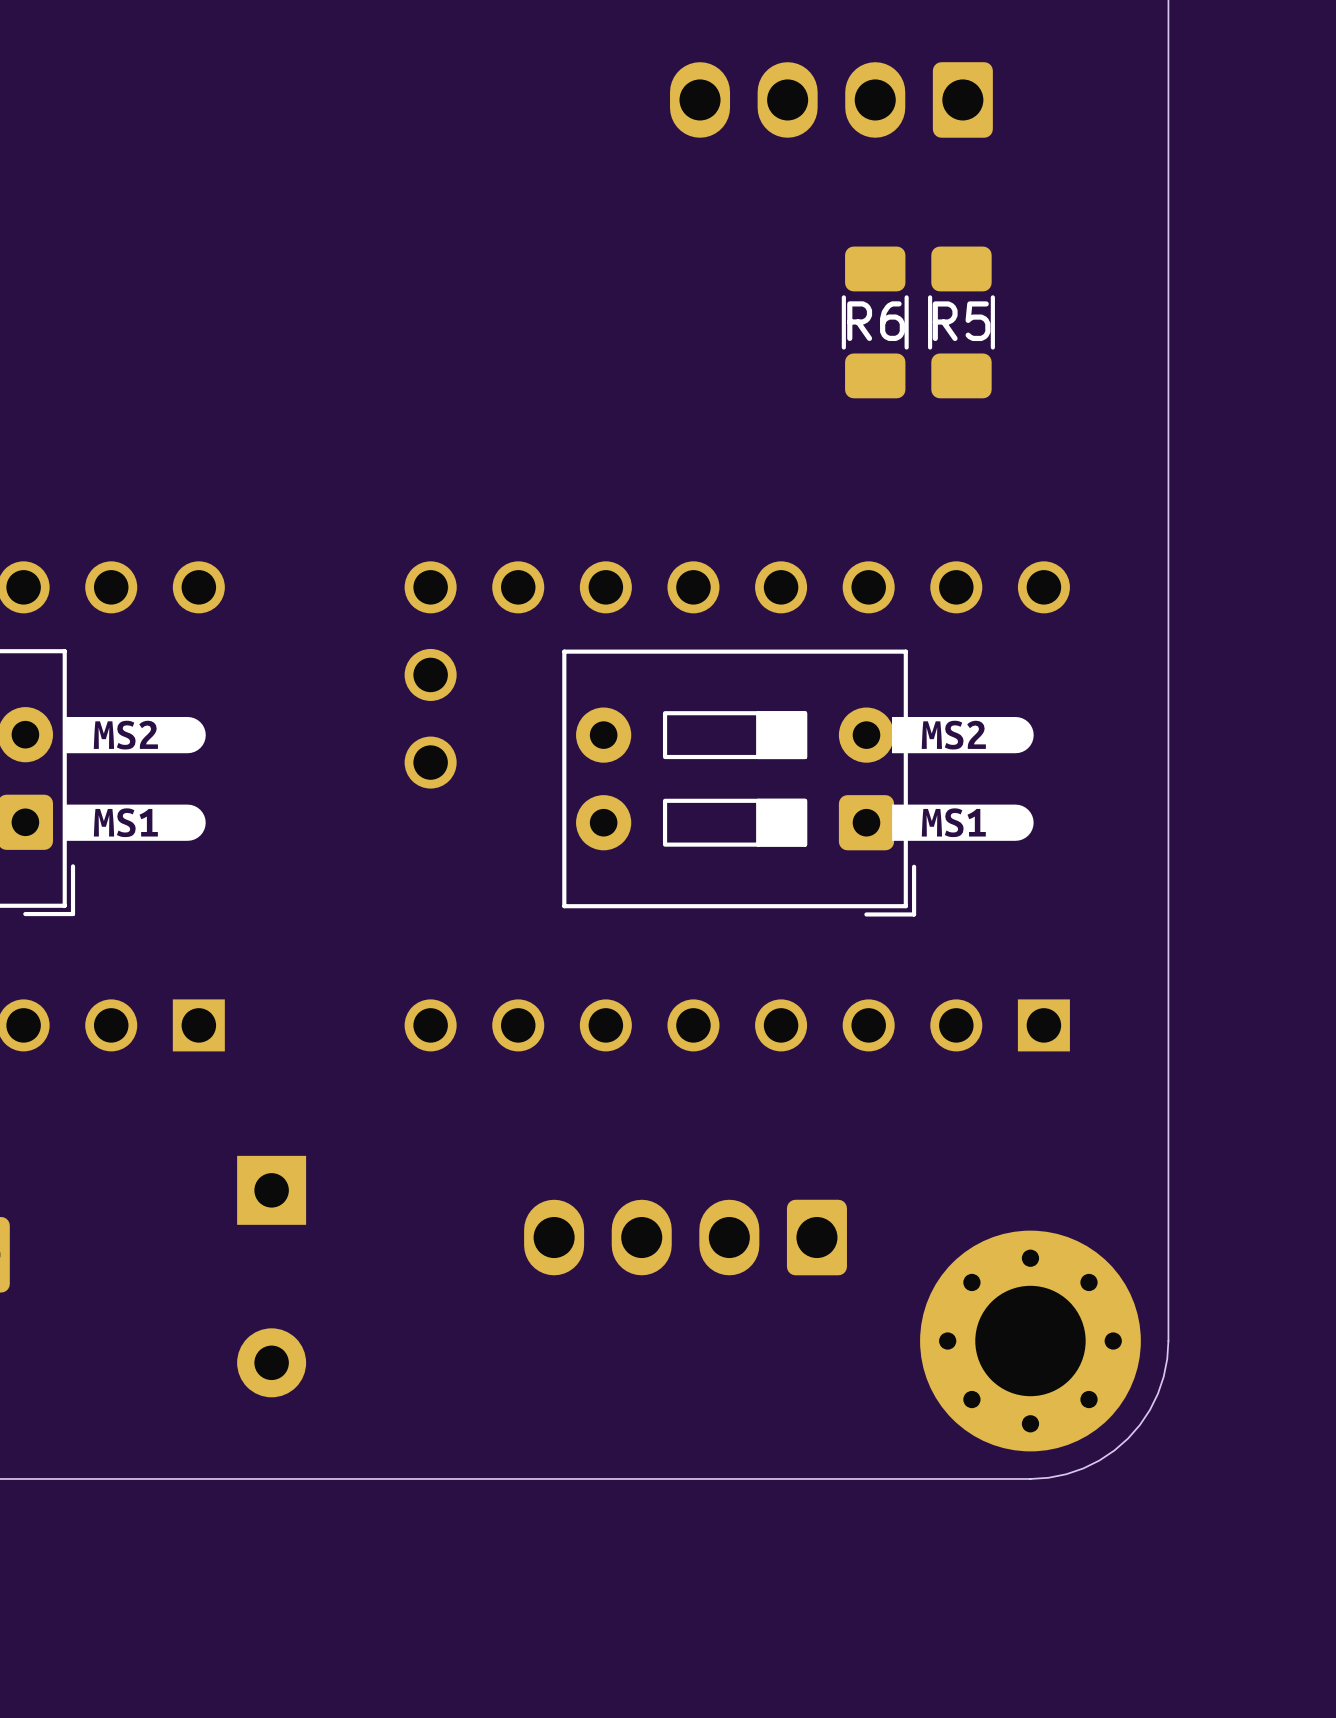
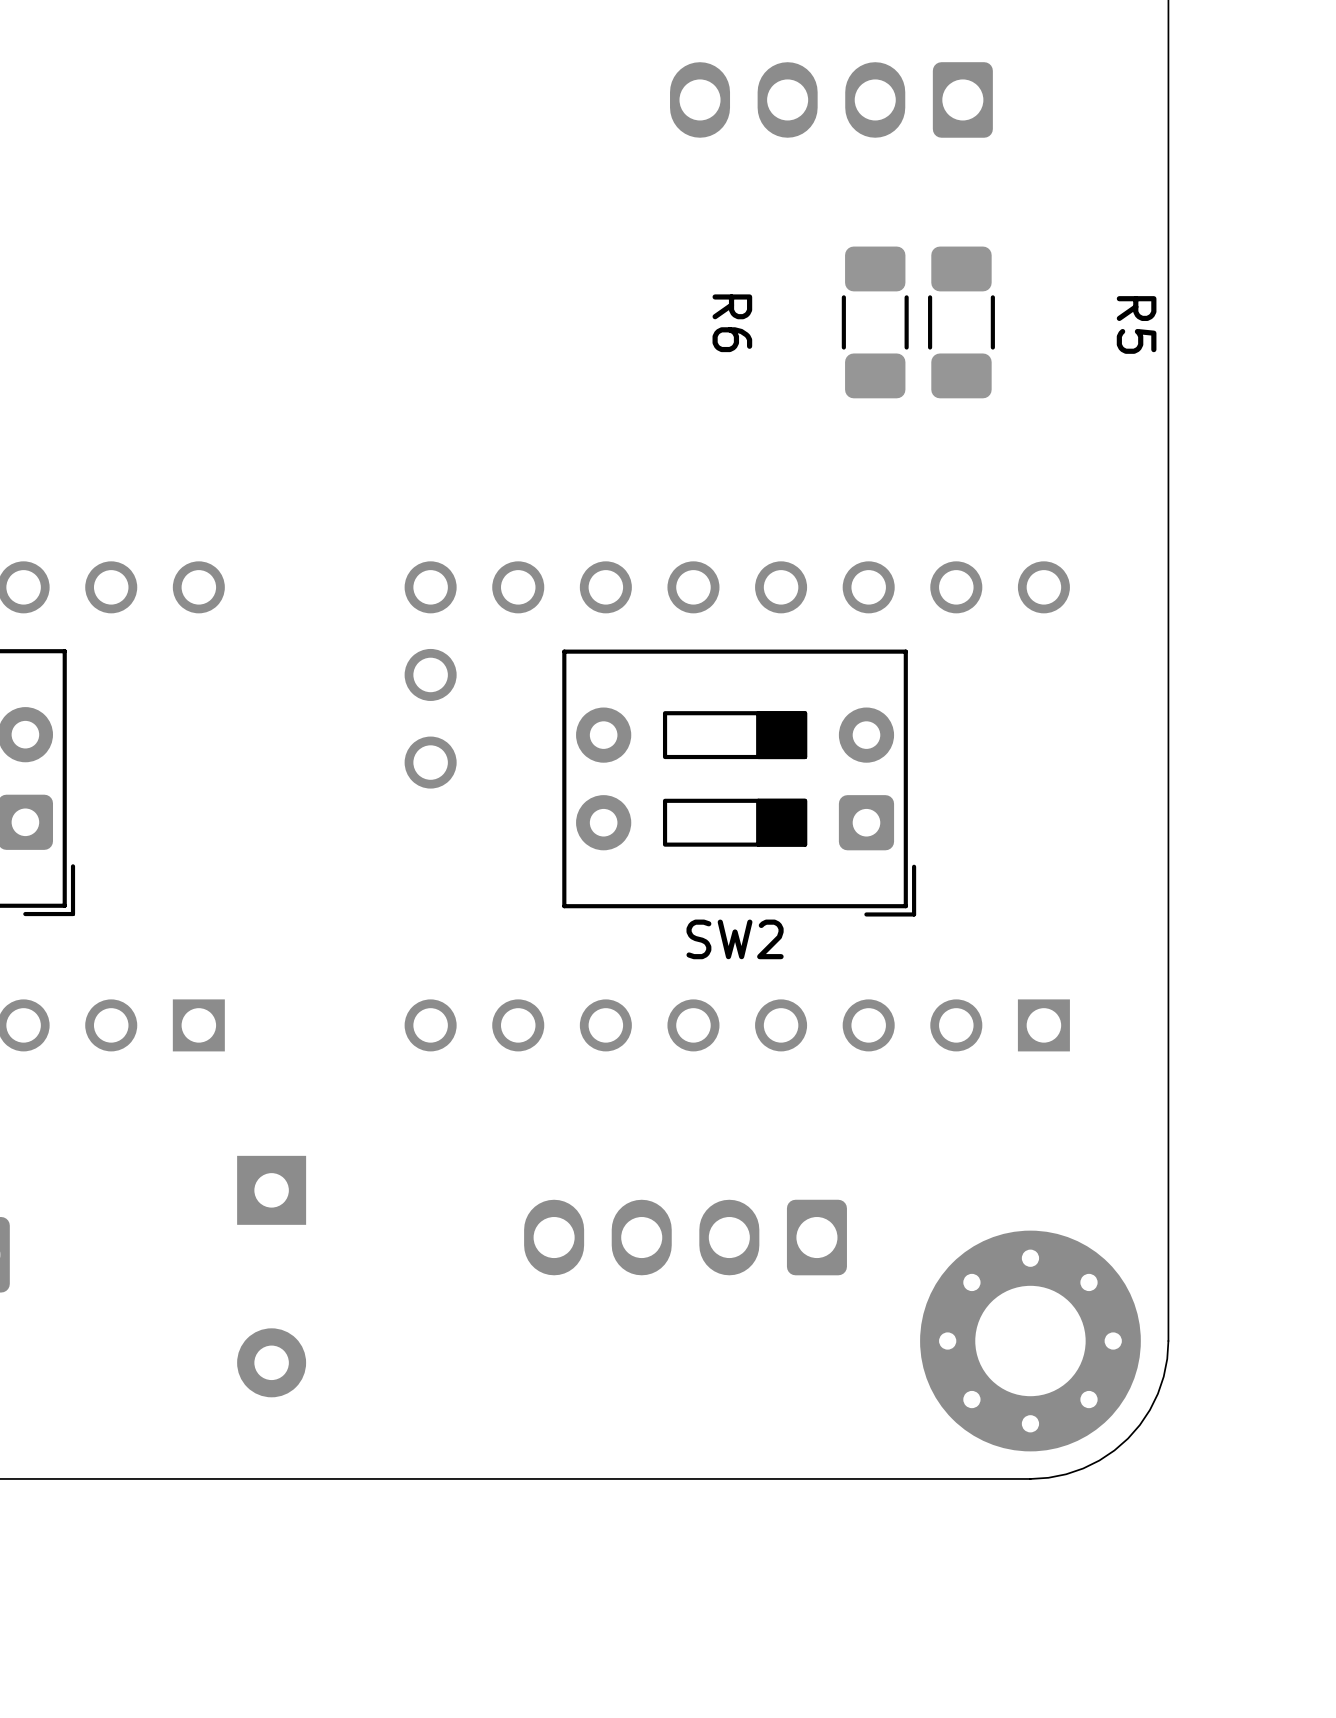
R6 name rotation: 0° (876, 321) -> 90° clockwise (732, 323)
R6 name position: R6 (876, 321) -> R6 (732, 323)
R5 name rotation: 0° (961, 321) -> 90° clockwise (1136, 324)
R5 name position: R5 (961, 321) -> R5 (1136, 324)
drawing: [64, 716, 206, 754] -> none
drawing: [892, 716, 1034, 754] -> none
drawing: [64, 804, 206, 841] -> none
drawing: [892, 804, 1034, 841] -> none
SW2 name: none -> SW2 (735, 939)

